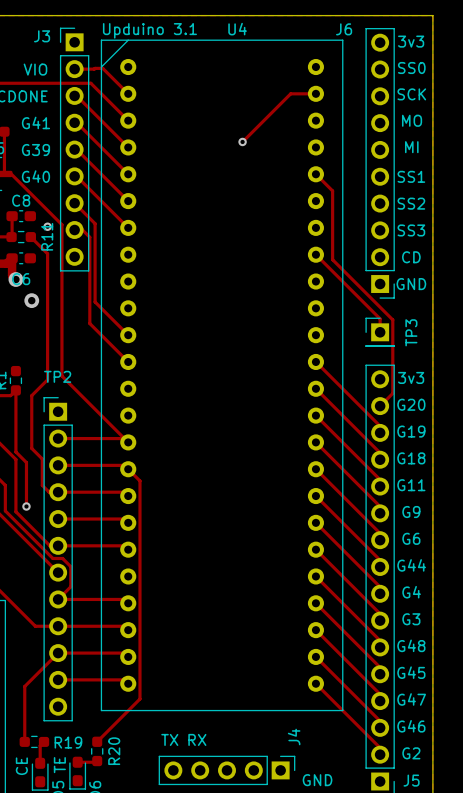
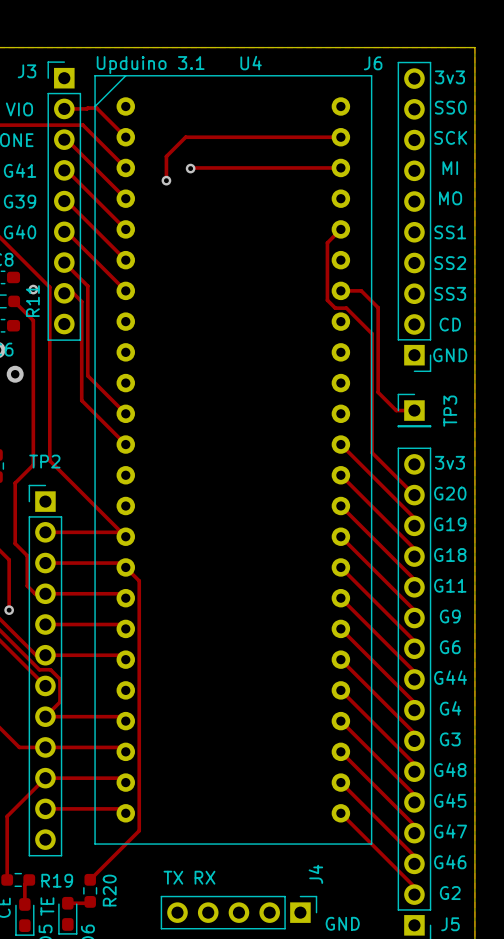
track: (290, 93) (242, 141) -> (311, 137) (185, 137) (166, 156) (166, 180)
track: none -> (340, 167) (190, 168)
text: MO (412, 120) -> MI (450, 168)
via: none -> (190, 168)
via: none -> (166, 180)
via: (242, 141) -> none
text: MI (411, 147) -> MO (450, 198)
track: (315, 174) (332, 190) (332, 259) (392, 319) (392, 393) (380, 406) -> (340, 229) (327, 242) (327, 300) (335, 308) (346, 308) (372, 333) (372, 452) (414, 495)
track: (315, 254) (380, 318) (380, 332) -> (340, 290) (361, 290) (378, 307) (378, 392) (396, 410) (414, 410)

